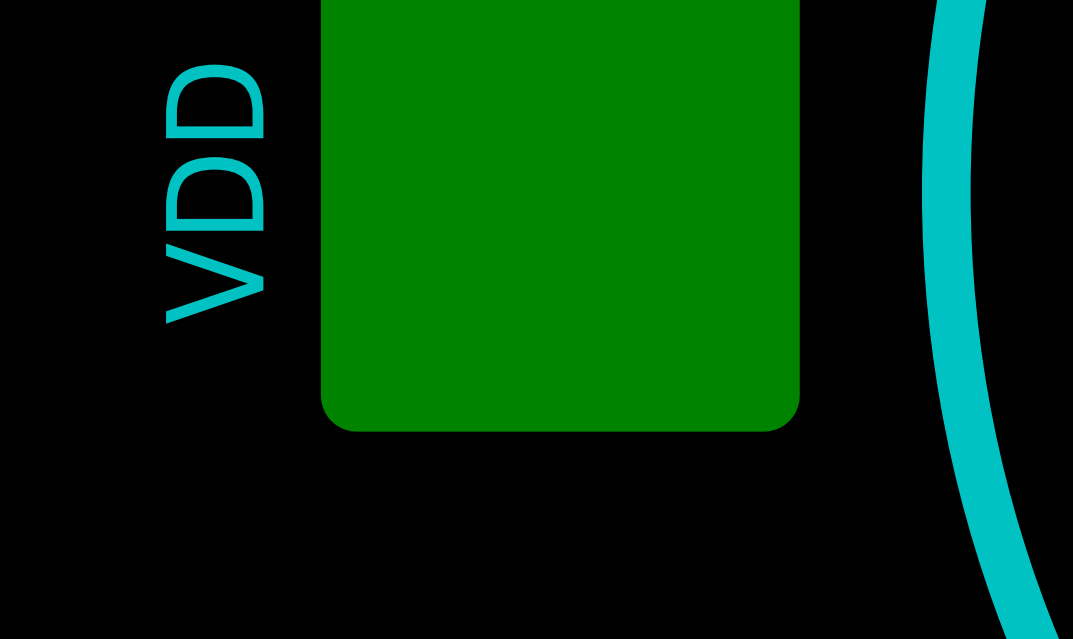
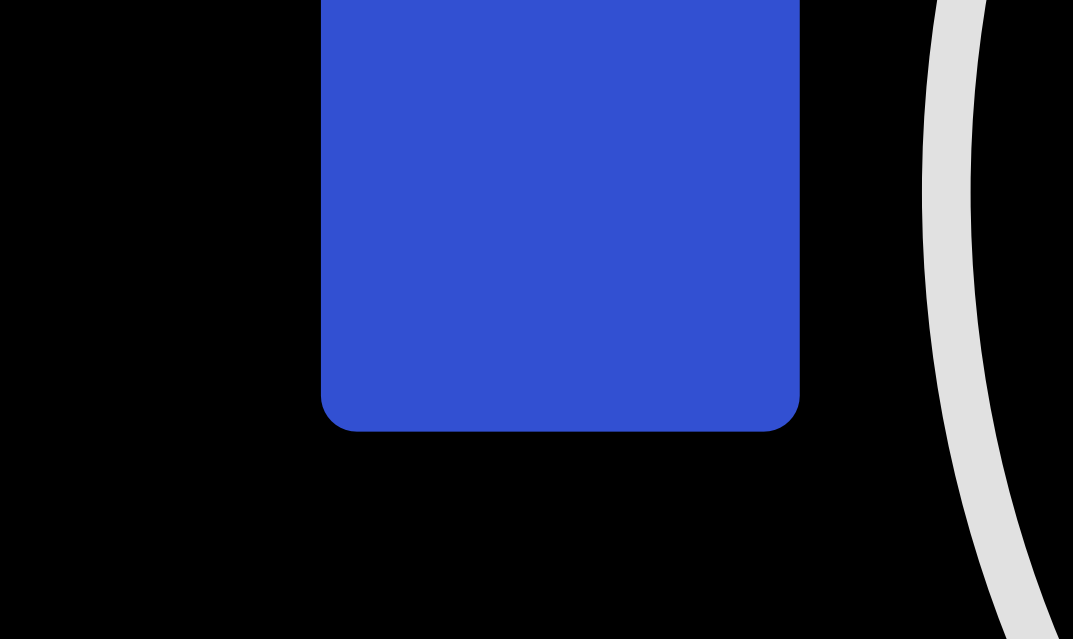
text: VDD (214, 194) -> none

